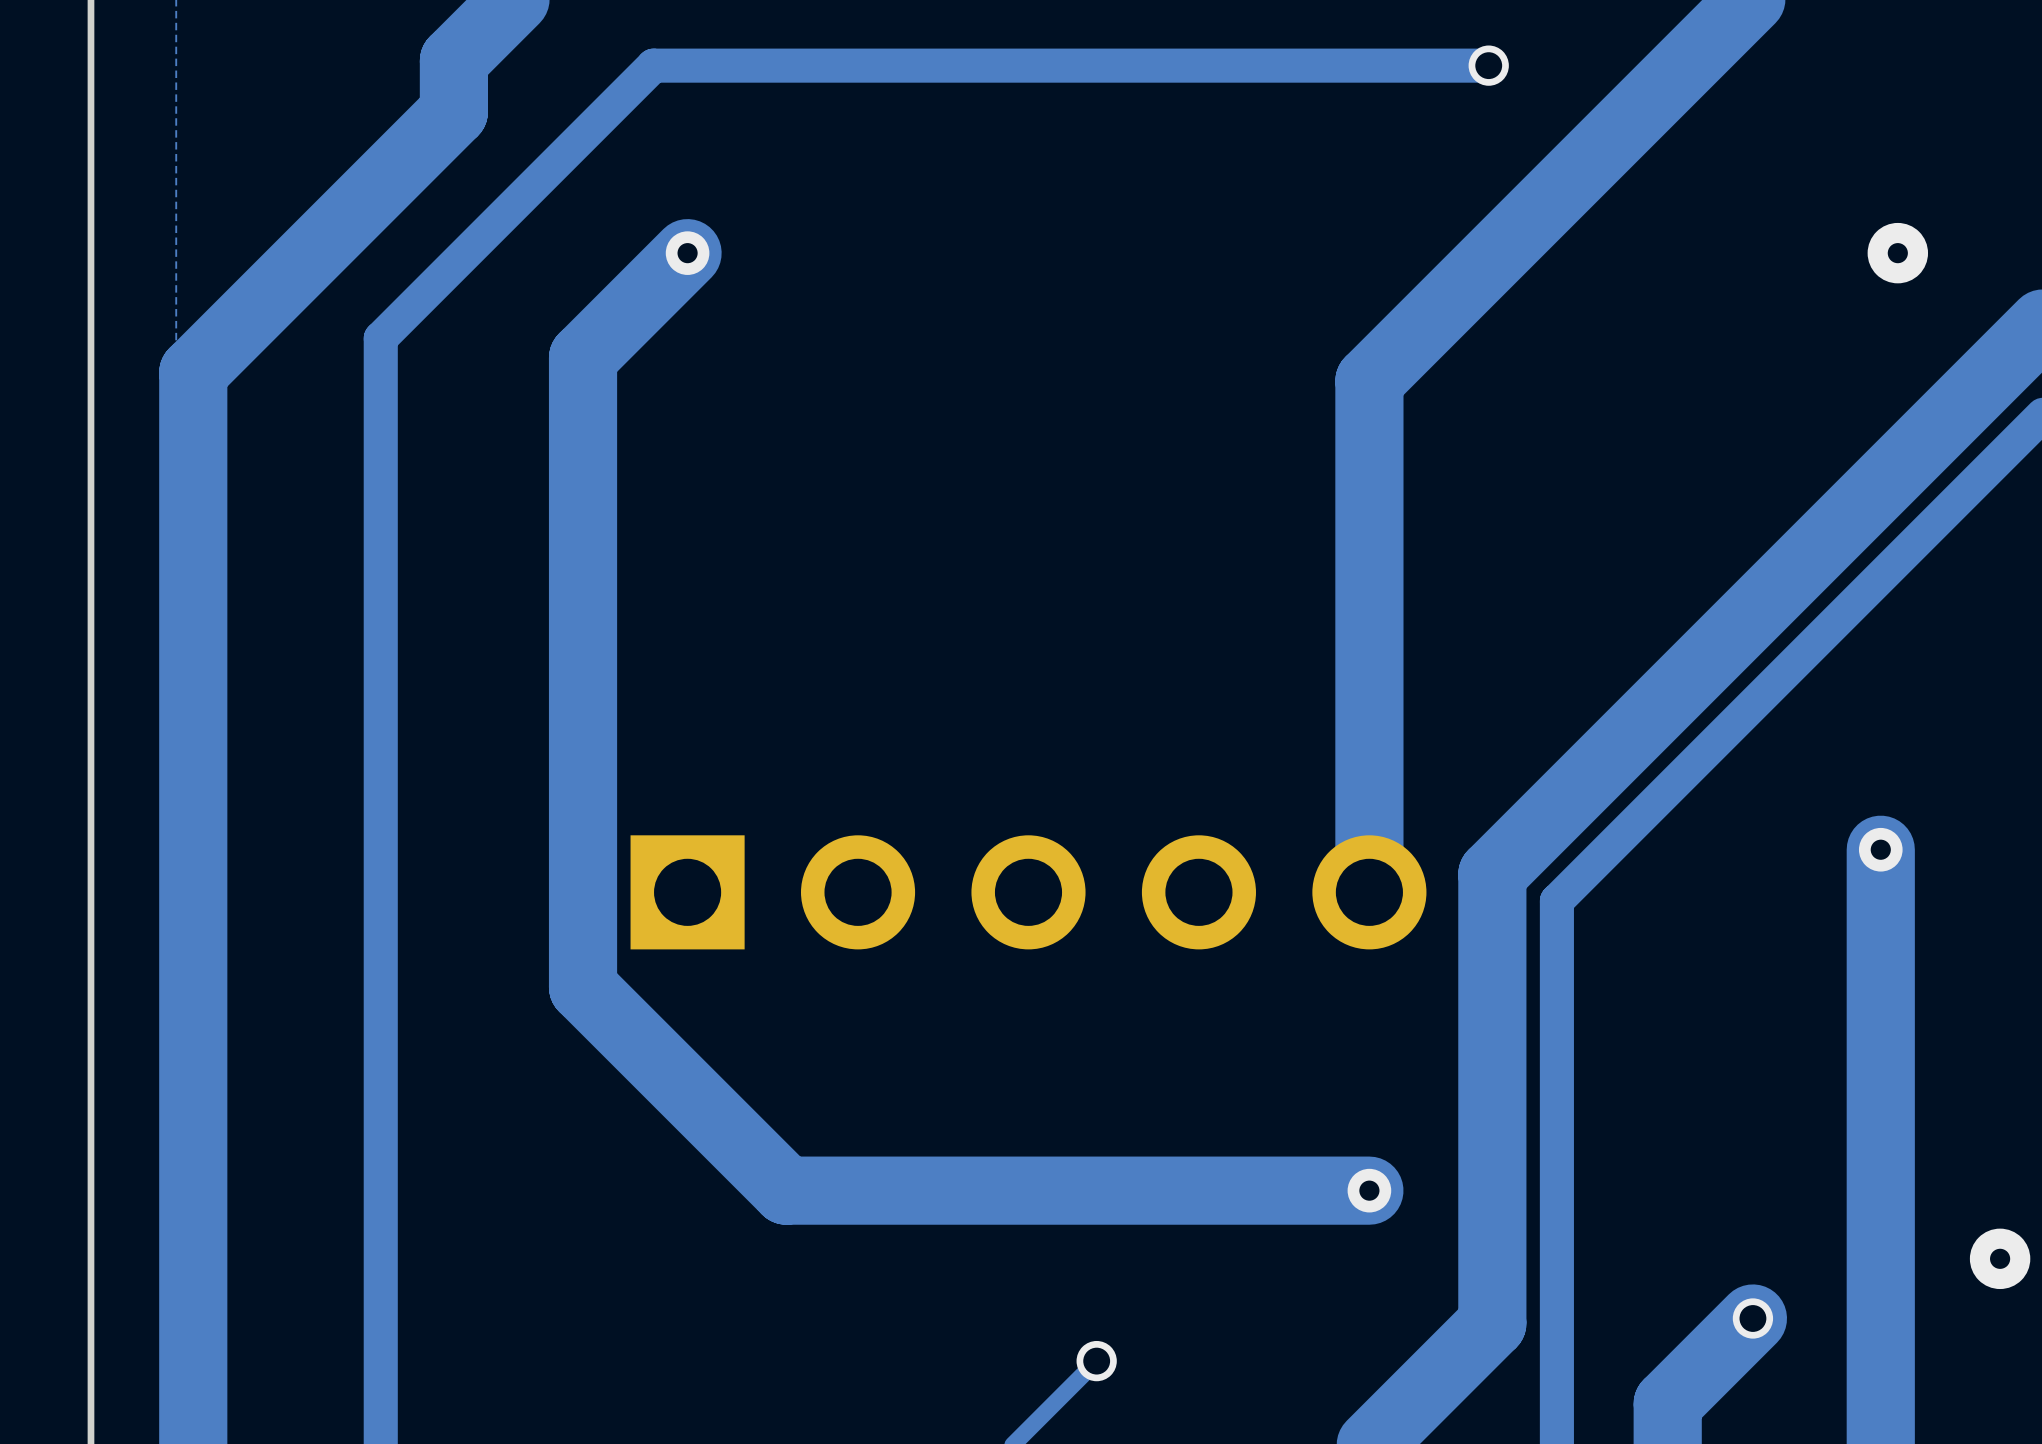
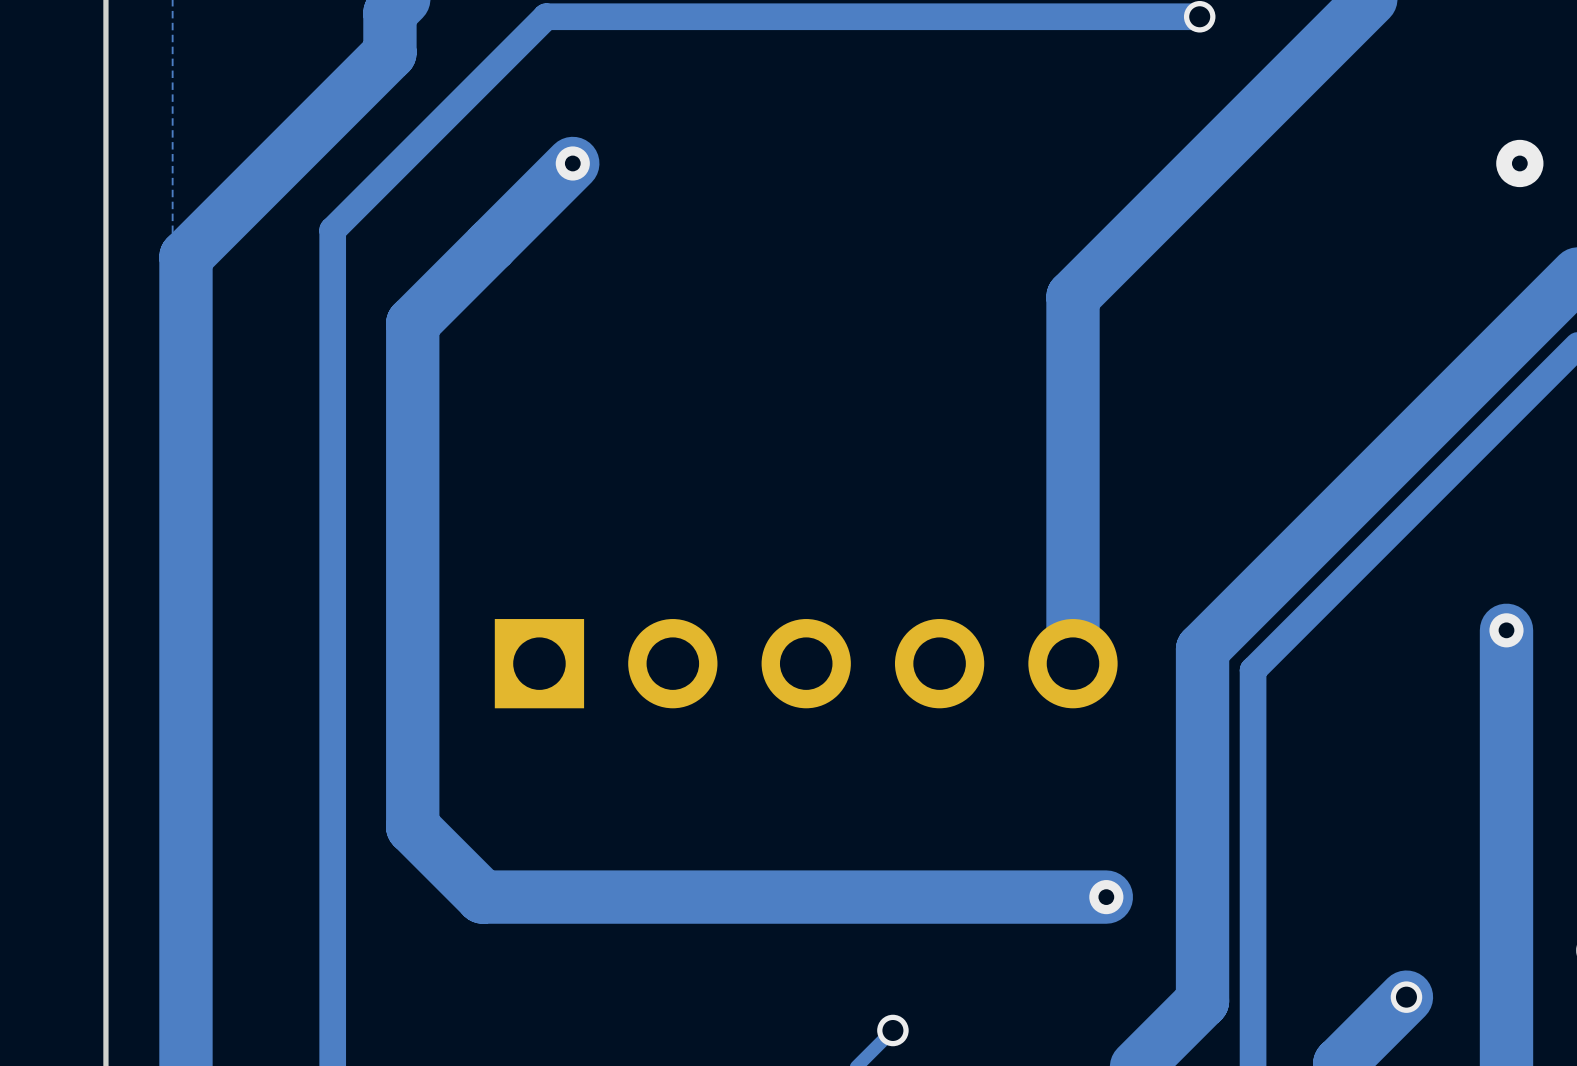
track: (583, 357) (583, 987) (786, 1190) -> (490, 245) (412, 323) (412, 827) (482, 897) (650, 897)
track: (1369, 380) (1369, 892) -> (1106, 263) (1072, 296) (1072, 663)
part position: (1028, 892) -> (806, 663)

